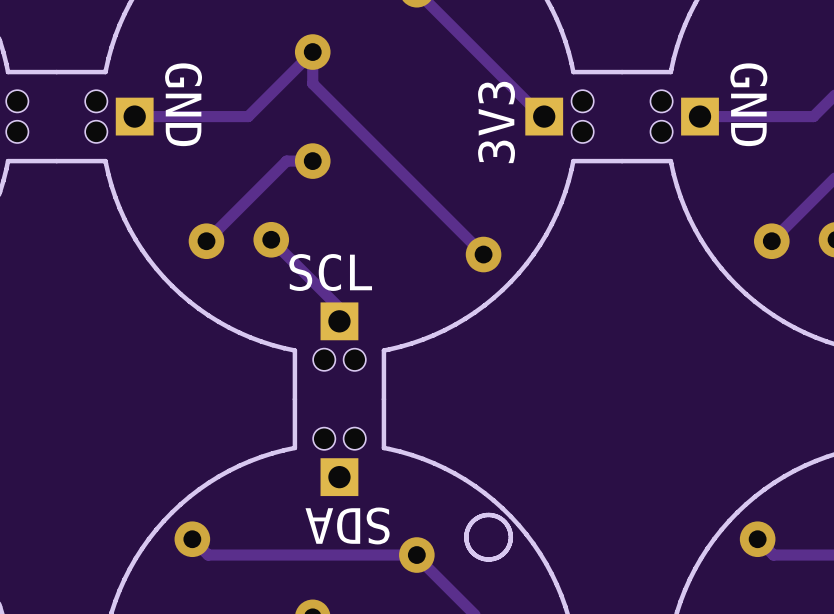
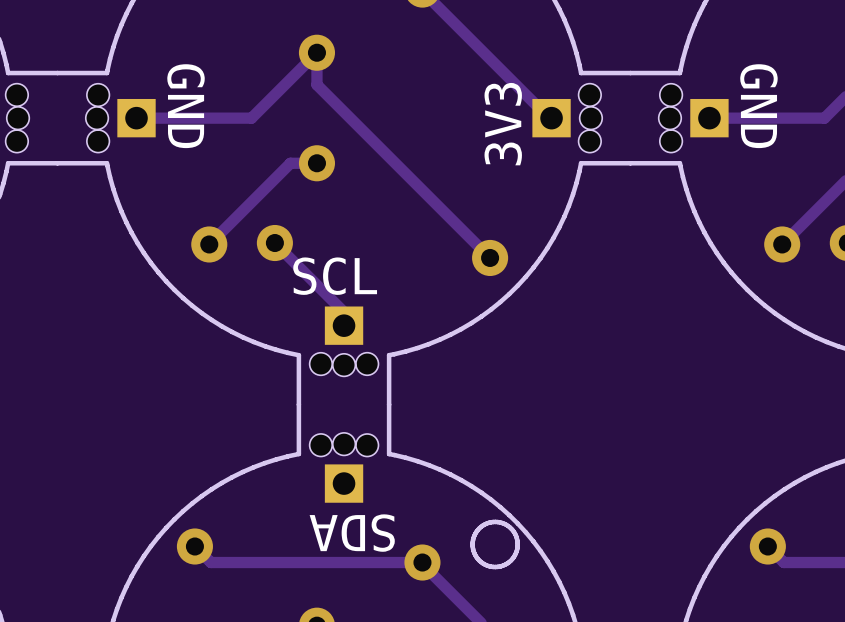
part: none -> (16, 94)
part: none -> (98, 95)
part: none -> (589, 94)
part: none -> (671, 95)
part: (17, 101) -> none
part: (96, 101) -> none
part: (582, 101) -> none
part: (661, 101) -> none
part: none -> (18, 118)
part: none -> (97, 118)
part: none -> (590, 118)
part: none -> (669, 118)
part: (17, 131) -> none
part: (96, 131) -> none
part: (582, 131) -> none
part: (661, 131) -> none
part: none -> (16, 141)
part: none -> (98, 141)
part: none -> (589, 141)
part: none -> (671, 141)
part: none -> (320, 364)
part: (324, 359) -> none
part: (354, 359) -> none
part: none -> (367, 363)
part: none -> (344, 365)
part: (324, 438) -> none
part: none -> (344, 444)
part: (354, 438) -> none
part: none -> (320, 445)
part: none -> (367, 445)

